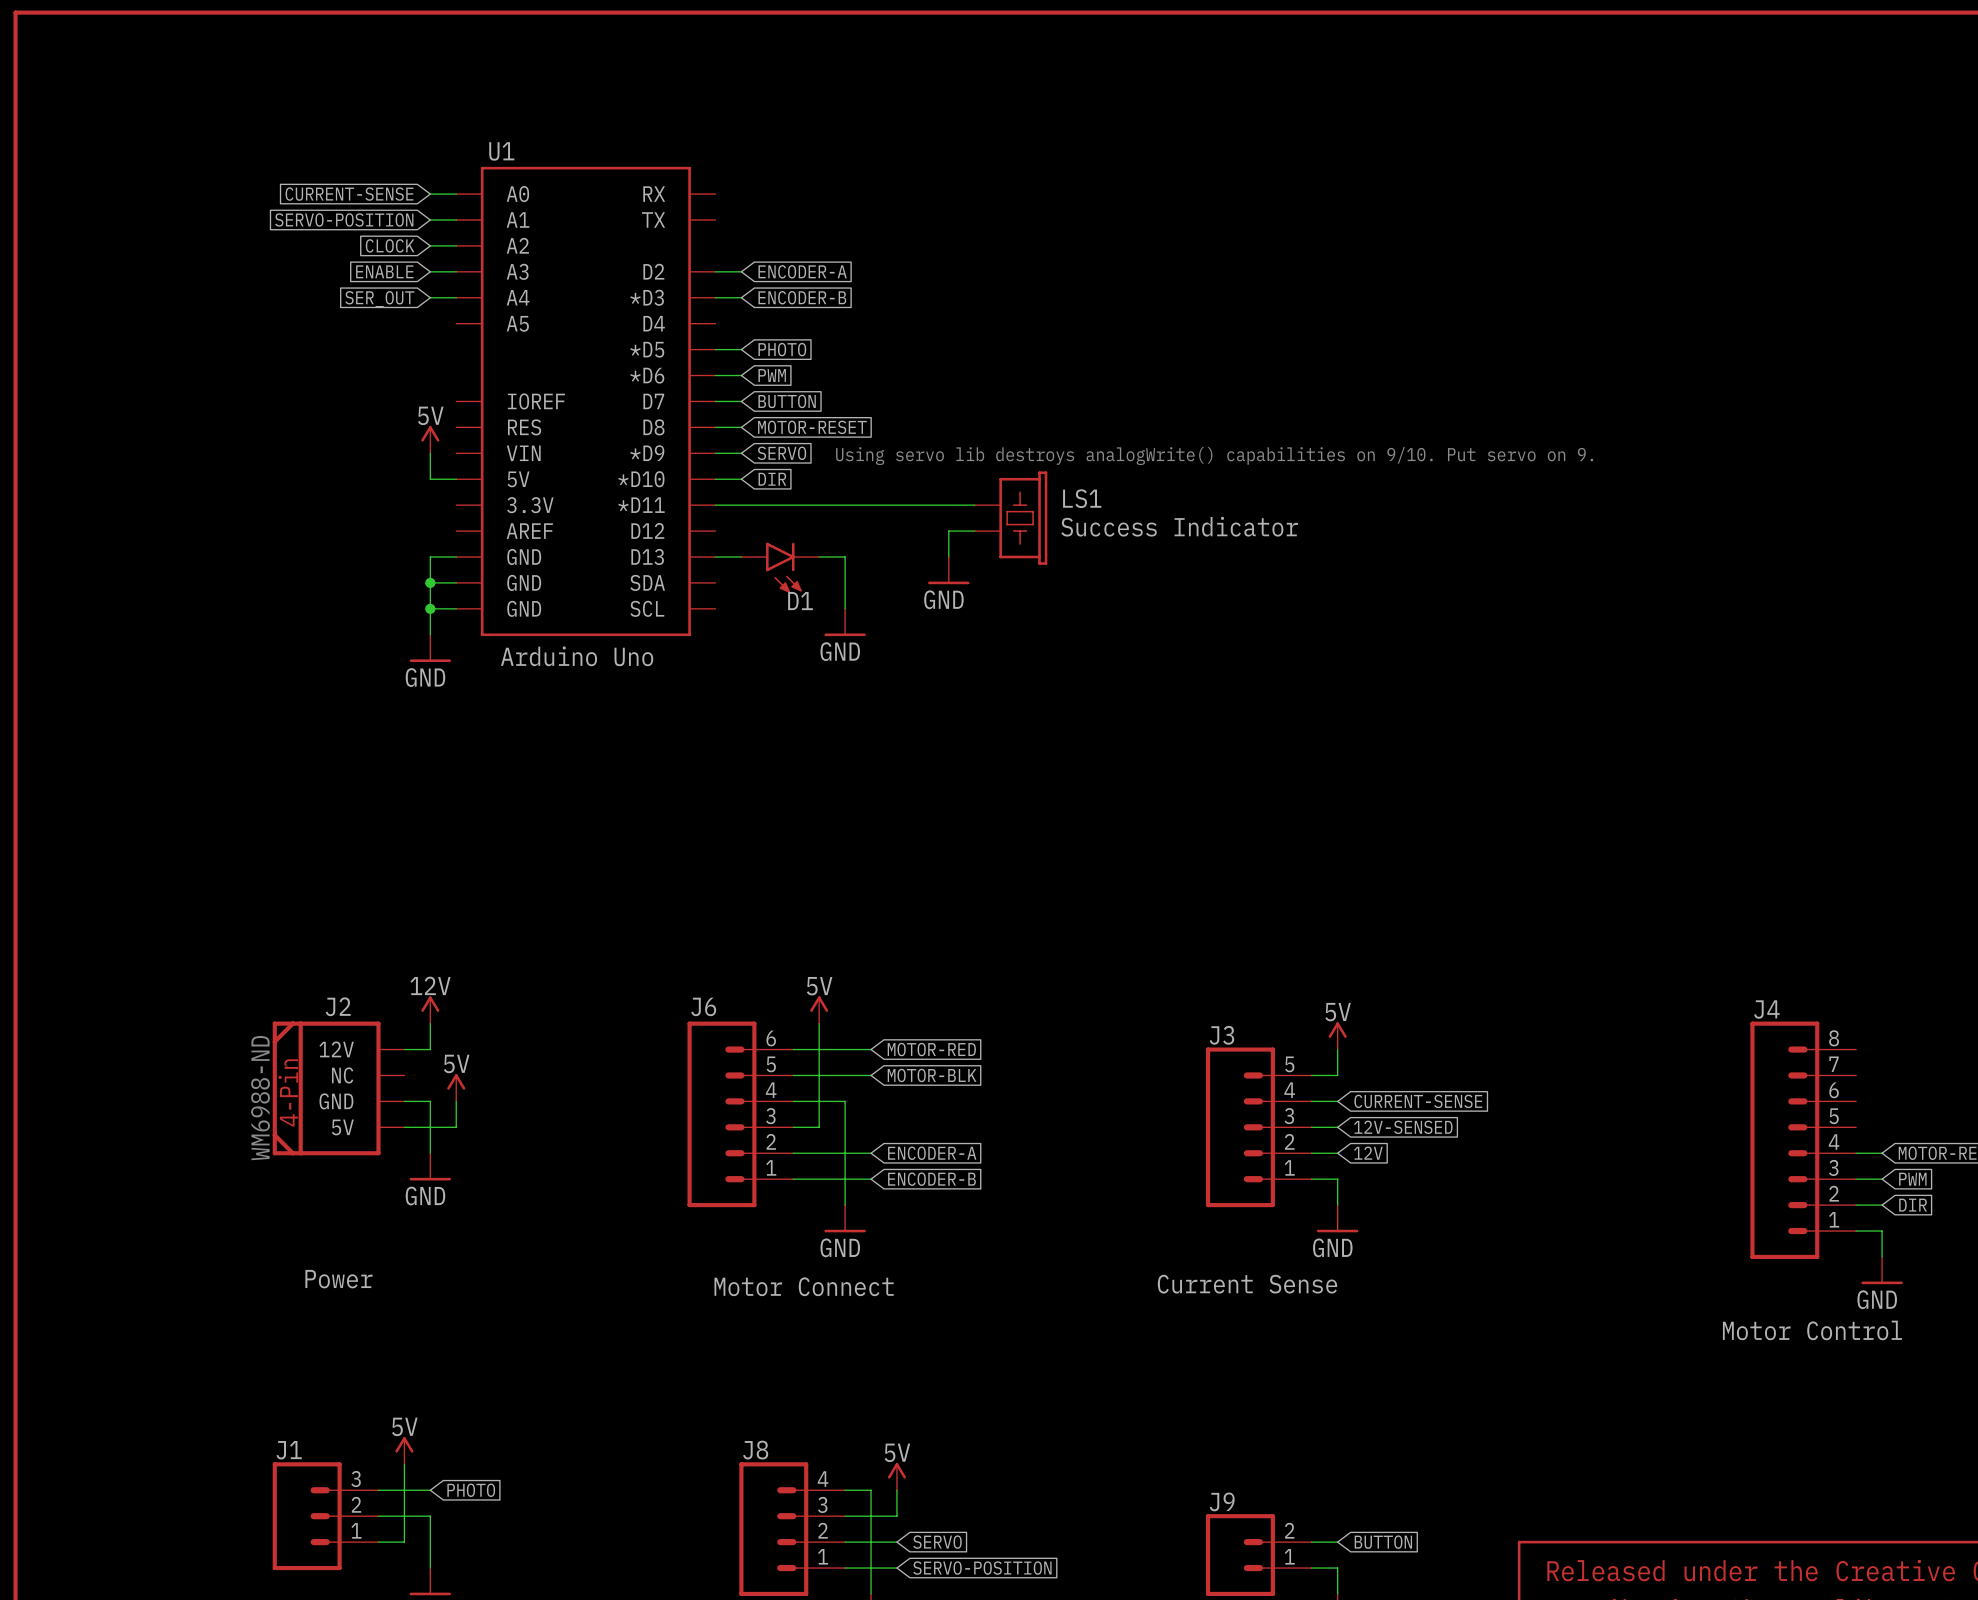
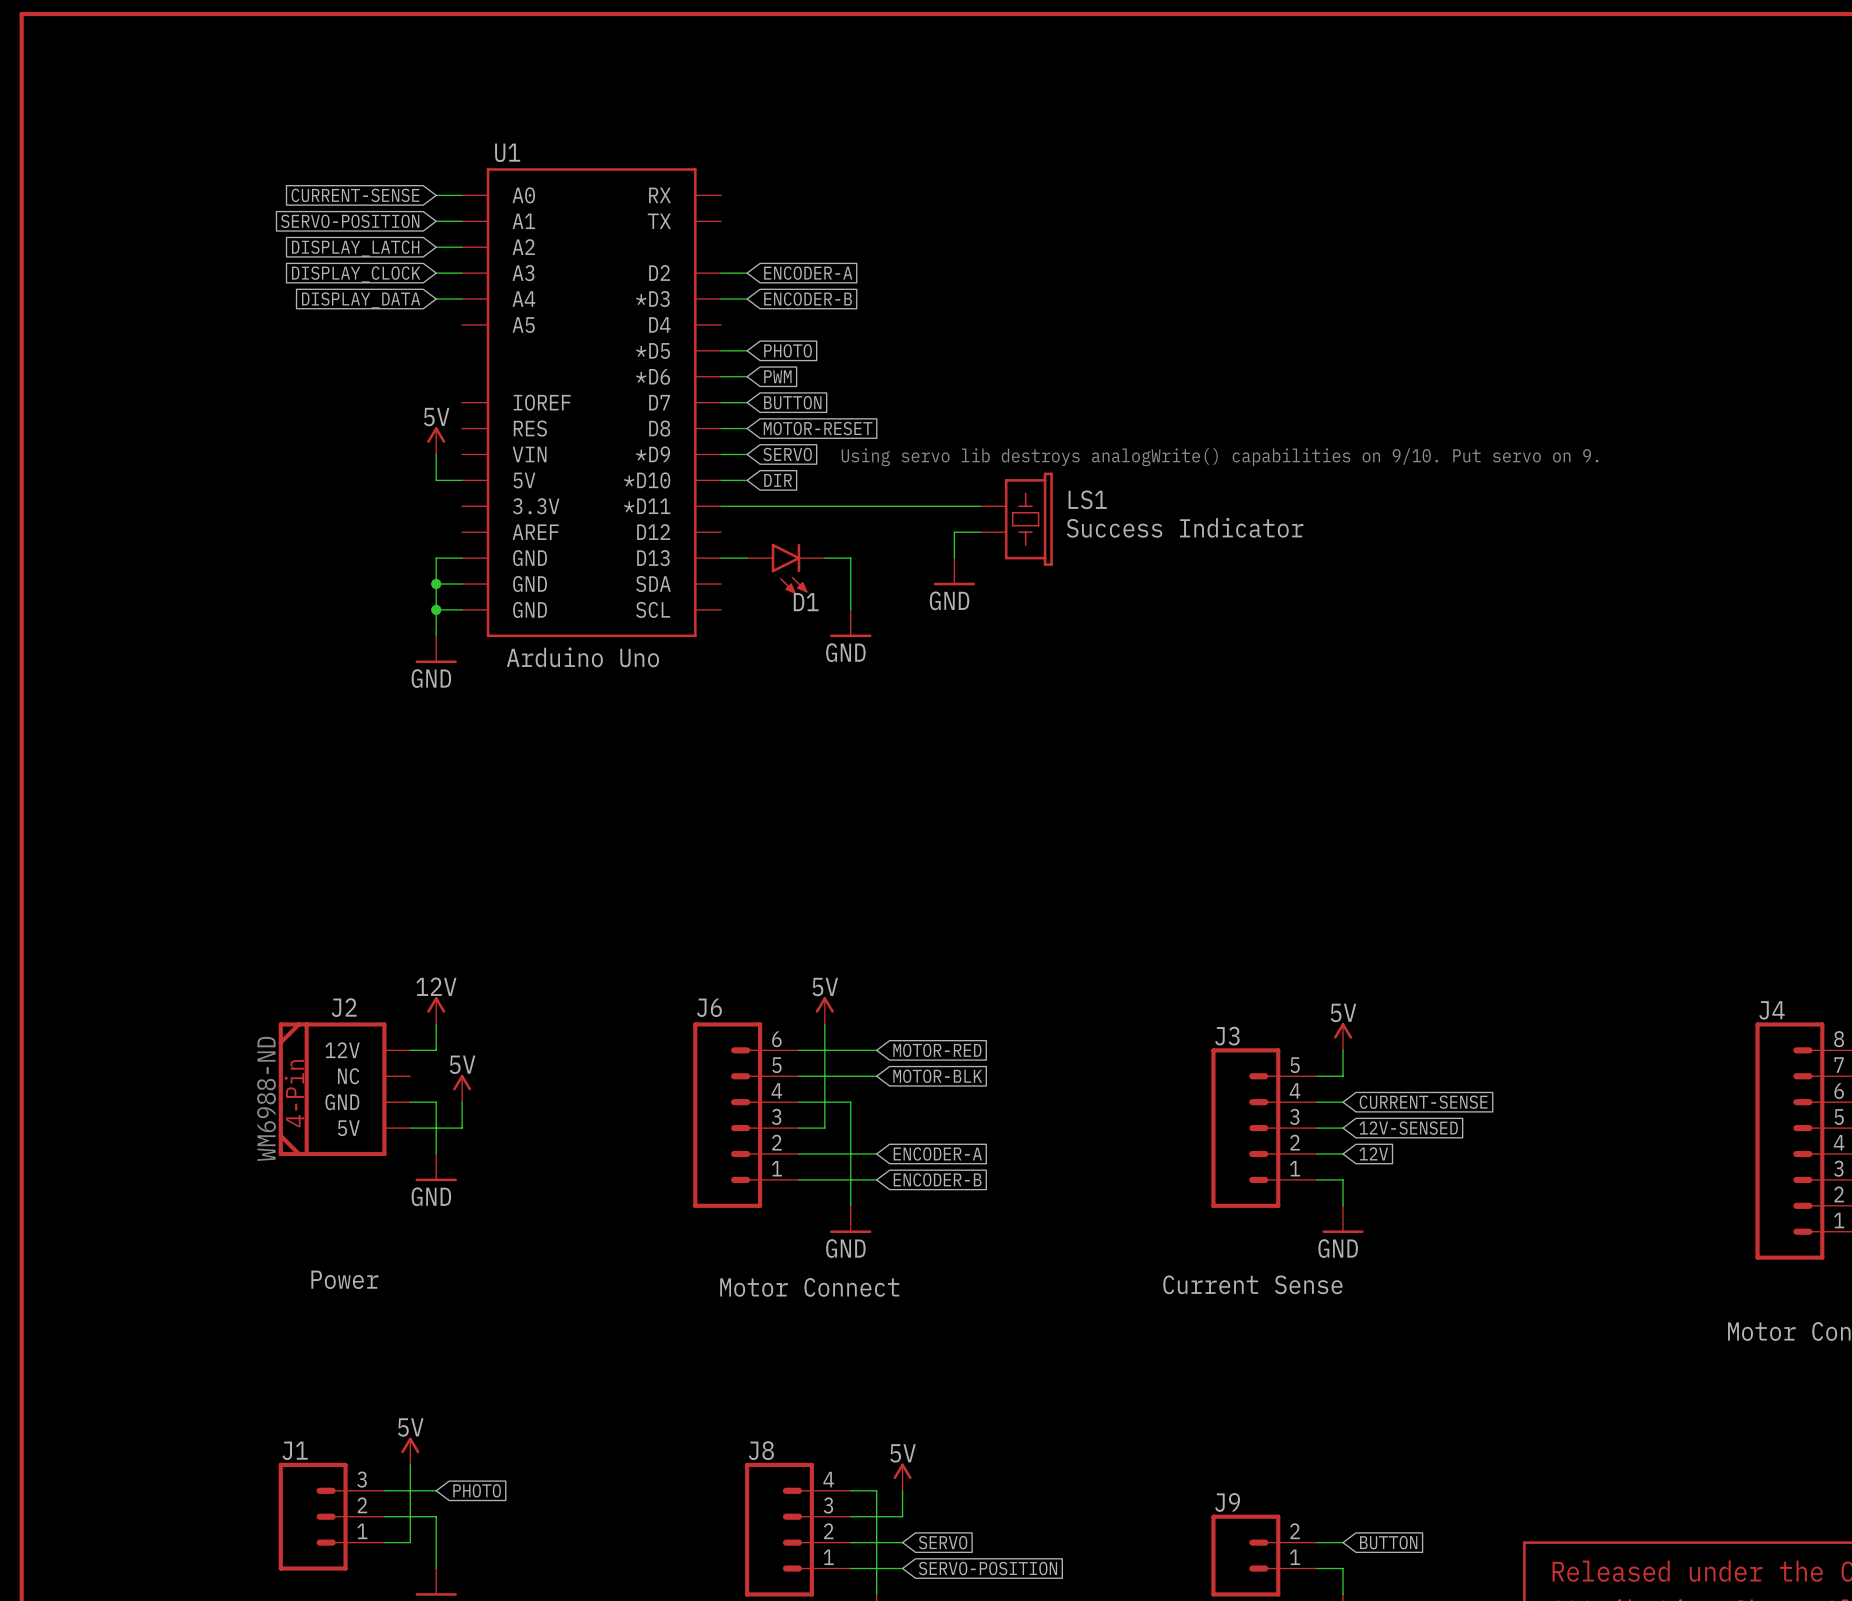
global label: CLOCK (390, 245) -> DISPLAY_LATCH (355, 248)
global label: ENABLE (384, 271) -> DISPLAY_CLOCK (356, 274)
global label: SER_OUT (379, 299) -> DISPLAY_DATA (361, 300)

